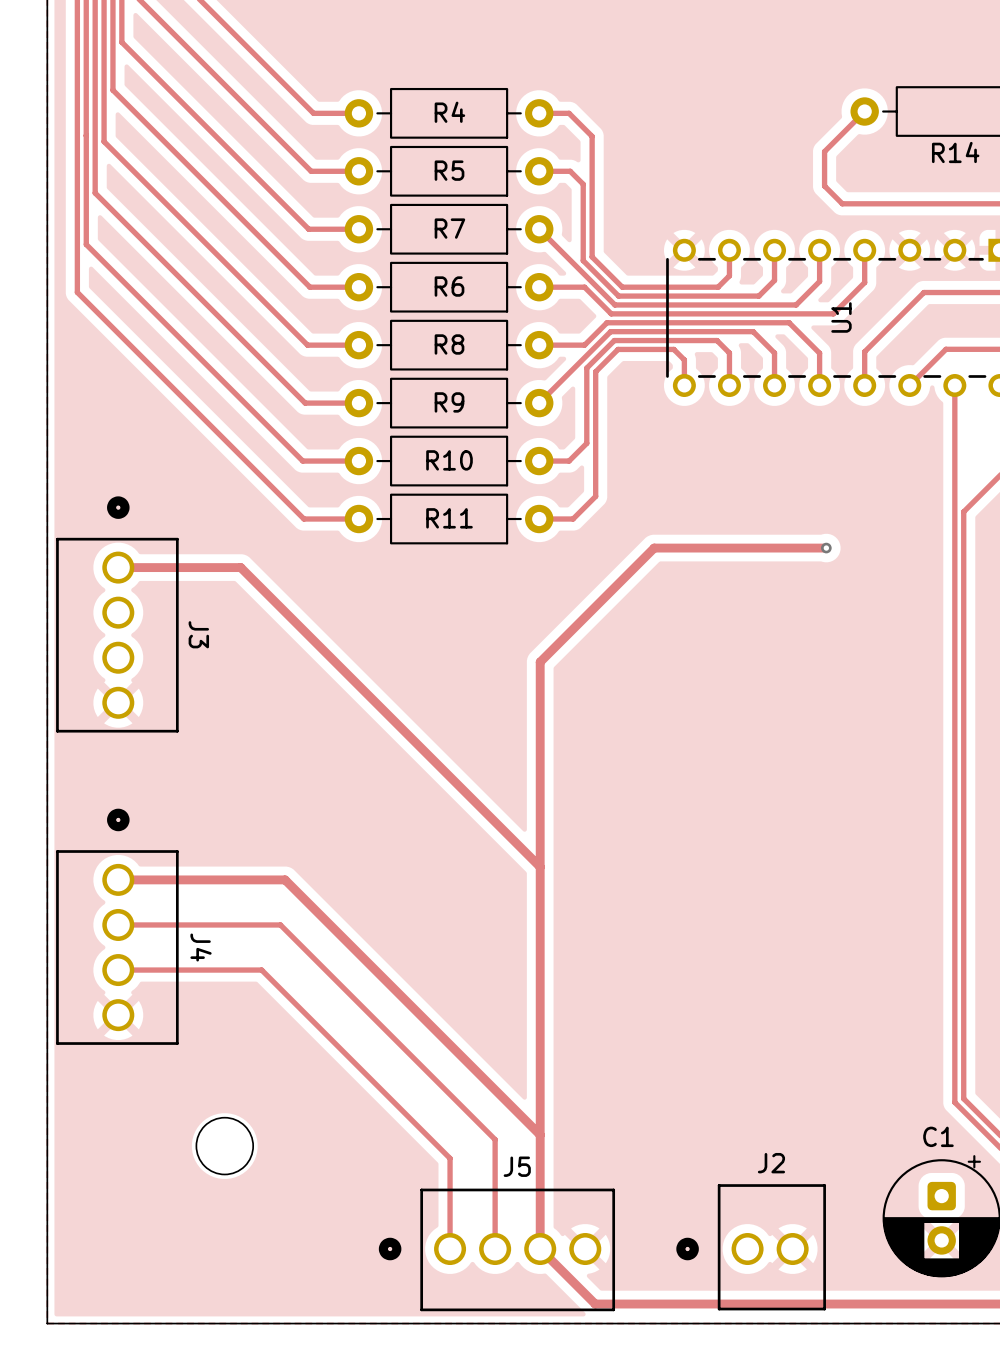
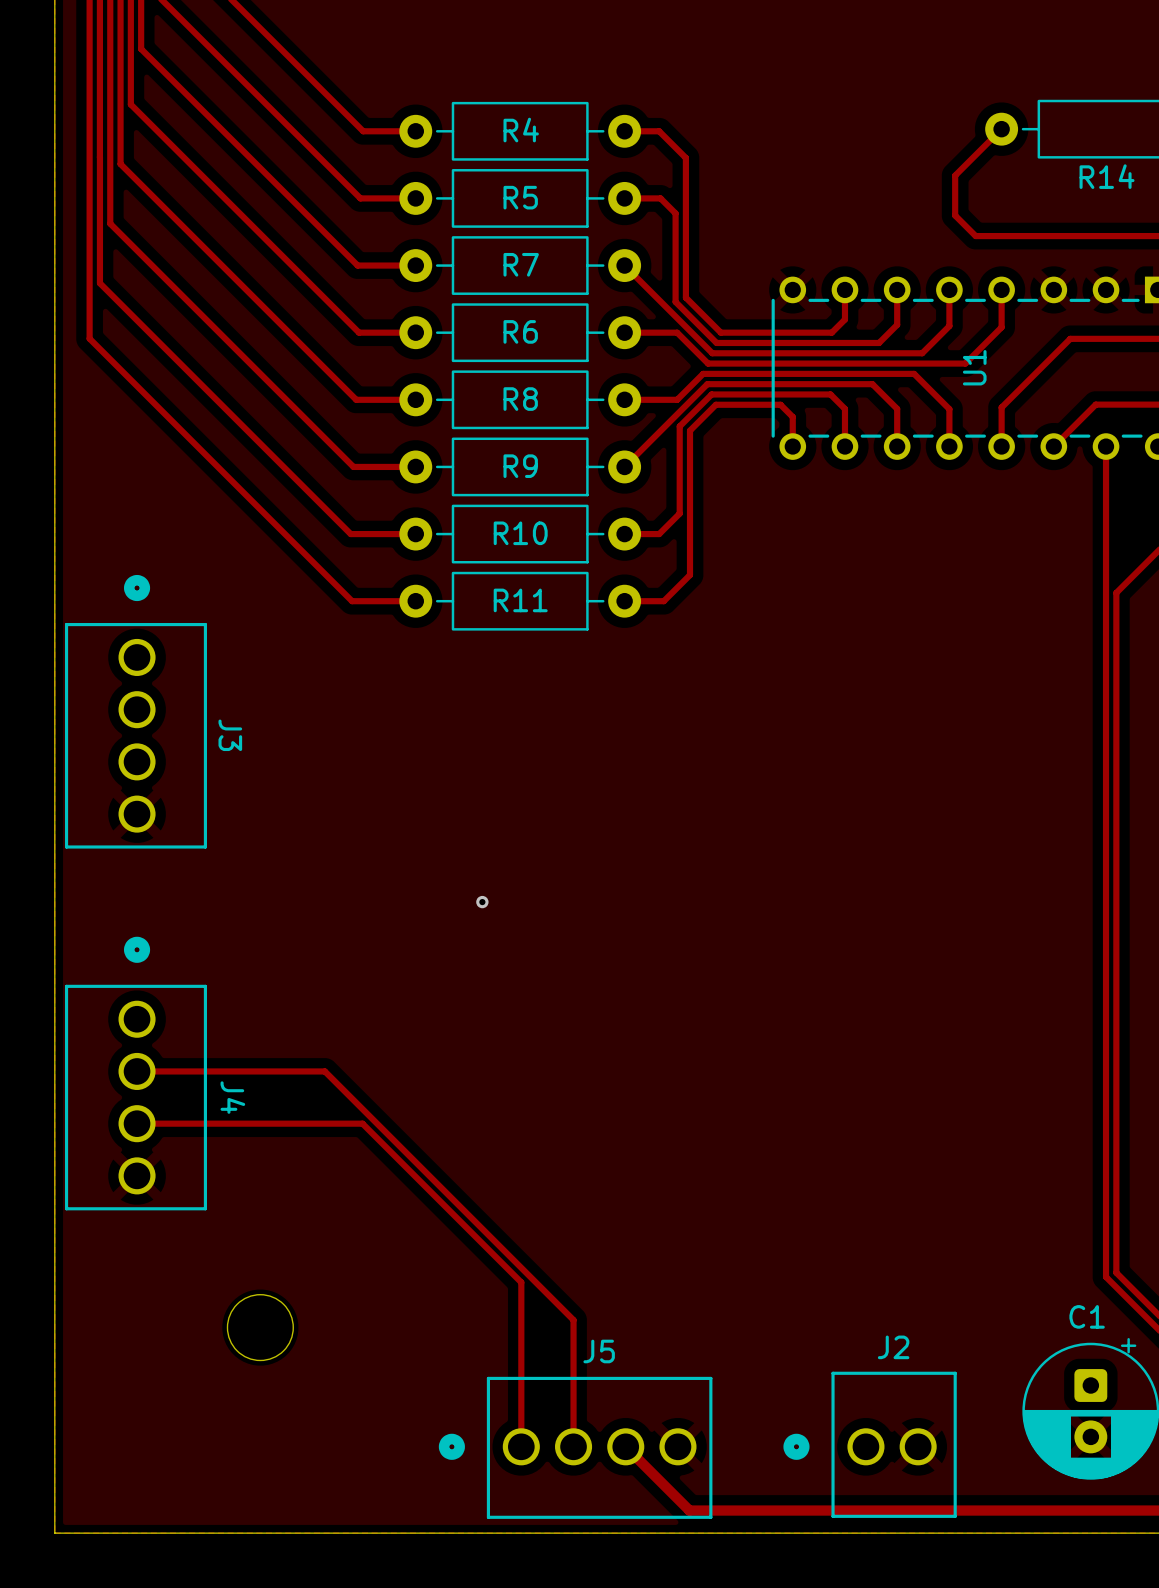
track: (826, 548) (654, 548) (540, 662) (540, 1249) -> none
via: (826, 548) -> none
track: (118, 567) (240, 567) (540, 867) -> none
via: none -> (482, 902)
track: (118, 879) (285, 879) (540, 1134) -> none
track: (261, 970) (450, 1158) -> (303, 1123) (362, 1123) (521, 1282) (521, 1341)

